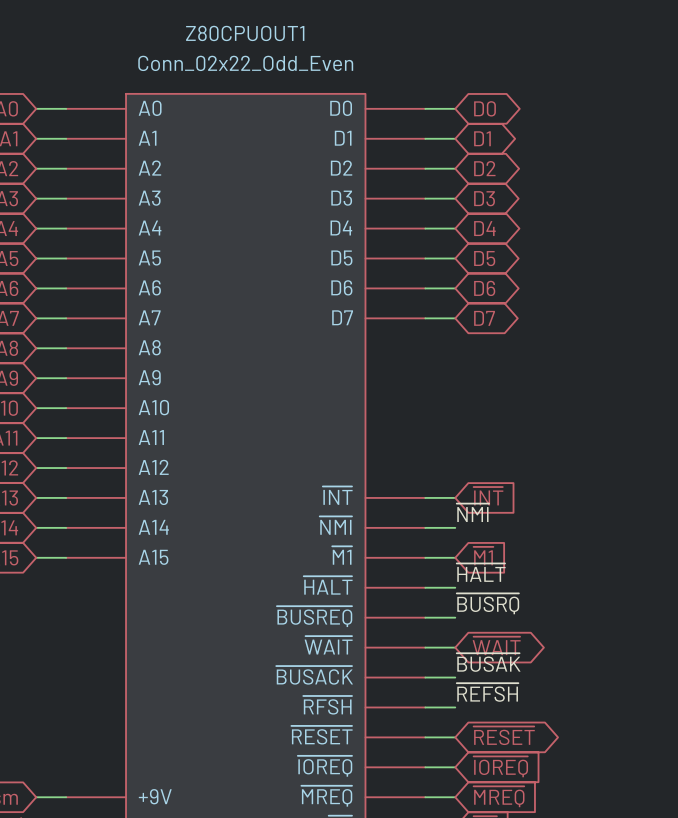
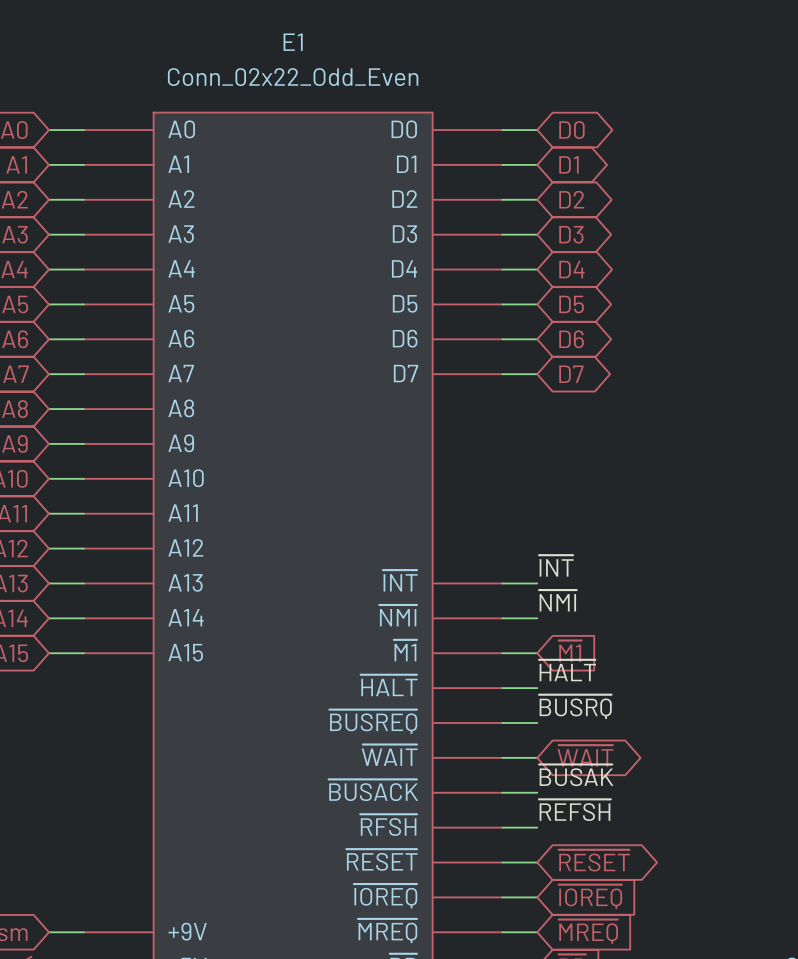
Z80CPUOUT1 name: Z80CPUOUT1 (245, 33) -> E1 (293, 42)
label: none -> ~{INT} (556, 565)
global label: ~{INT} (488, 496) -> none

